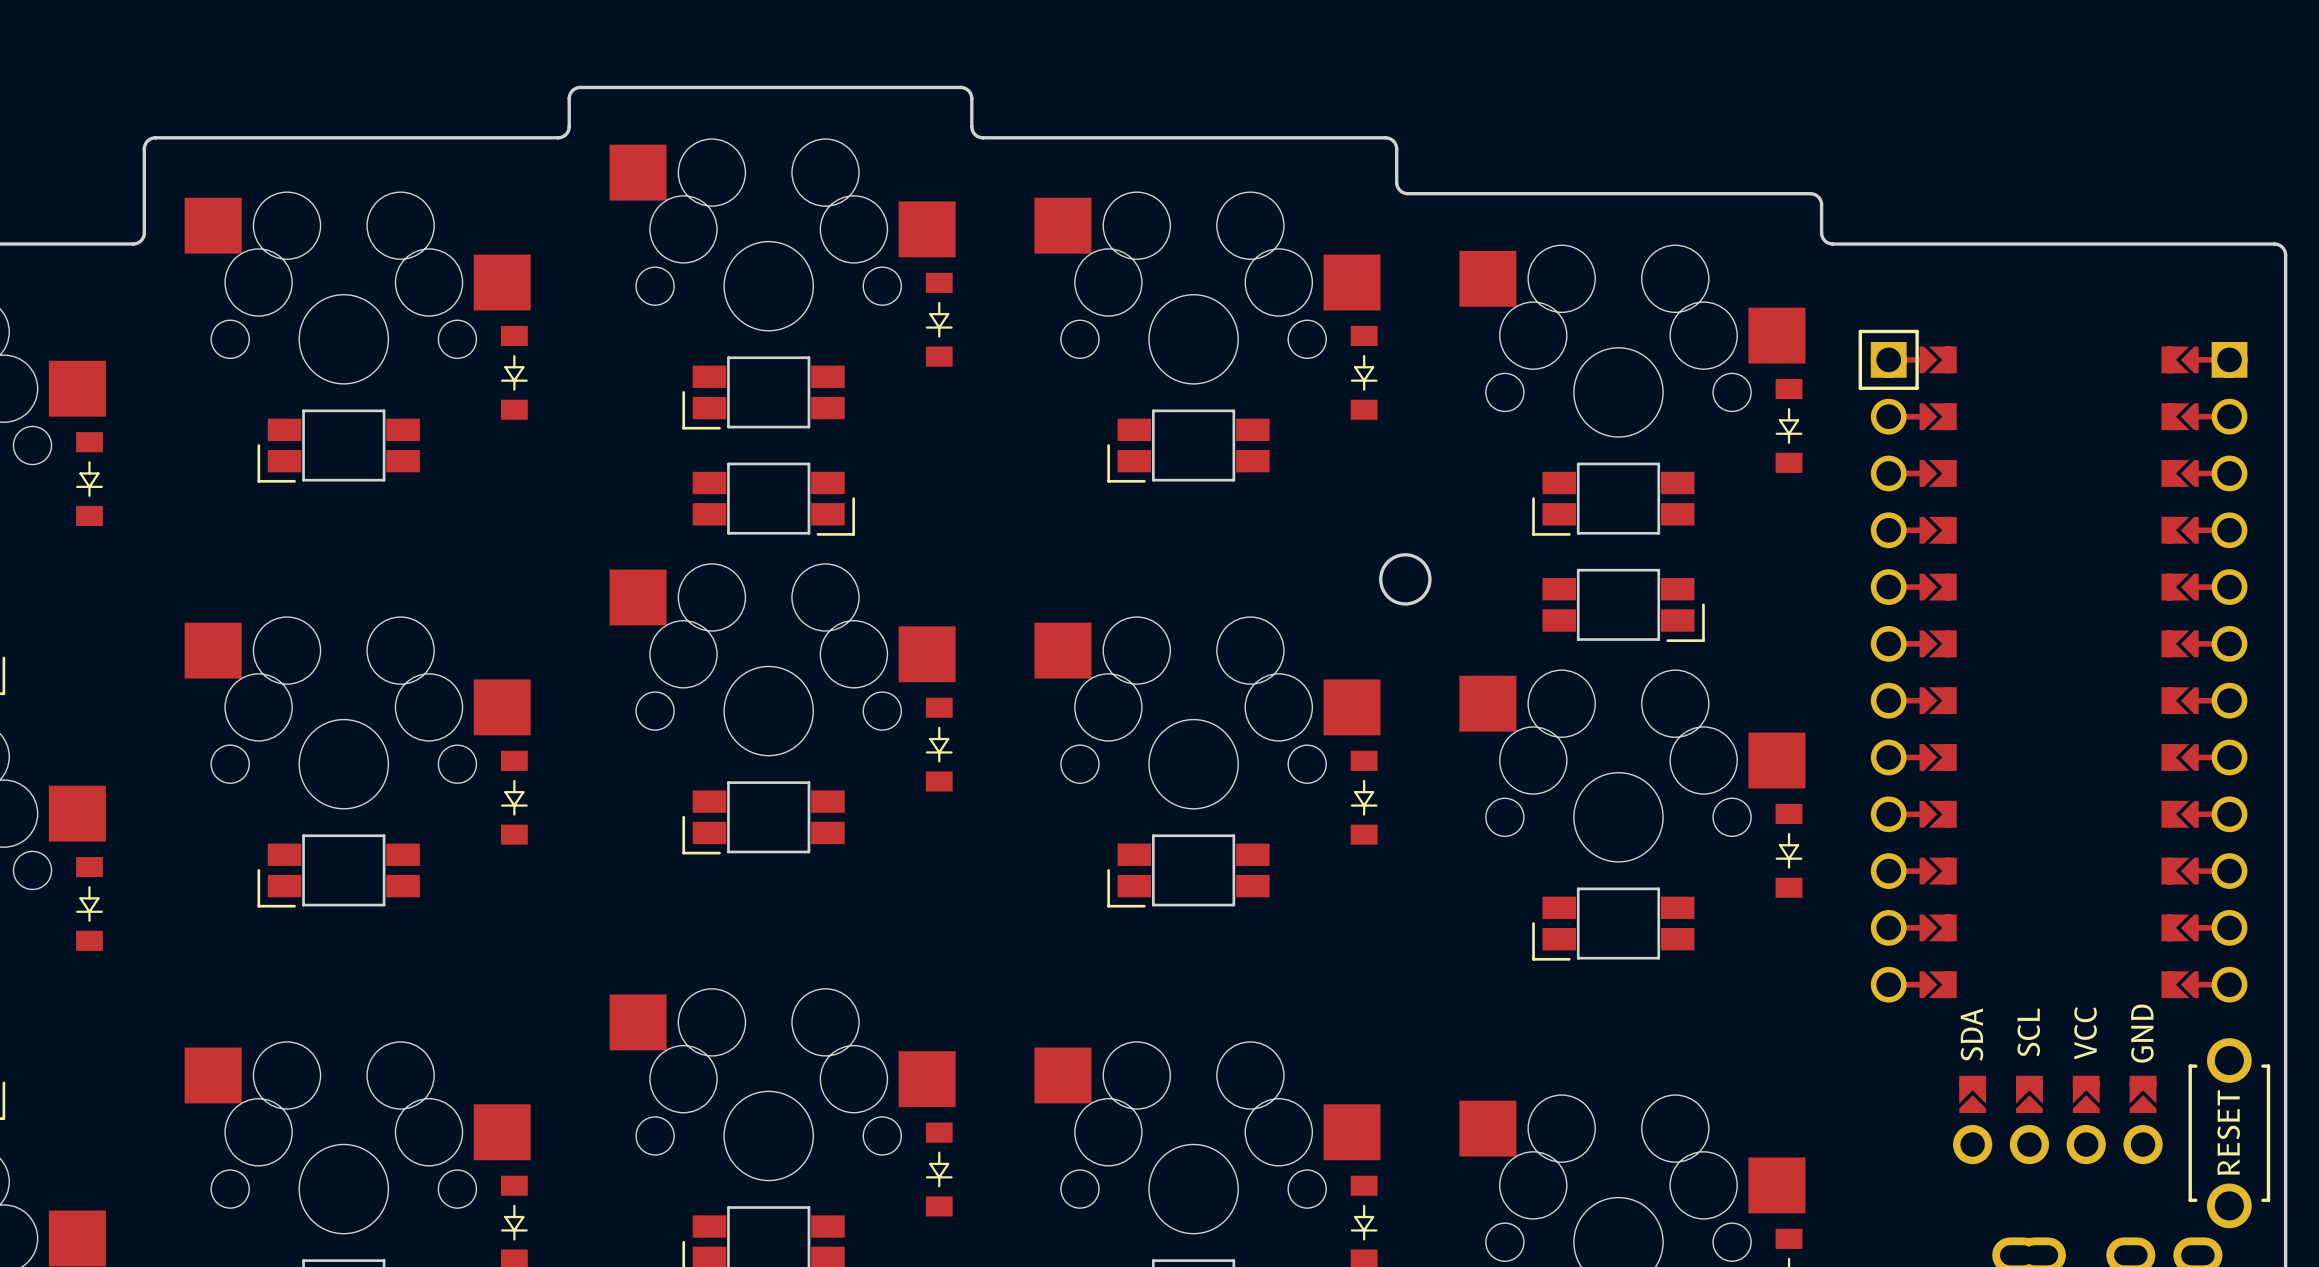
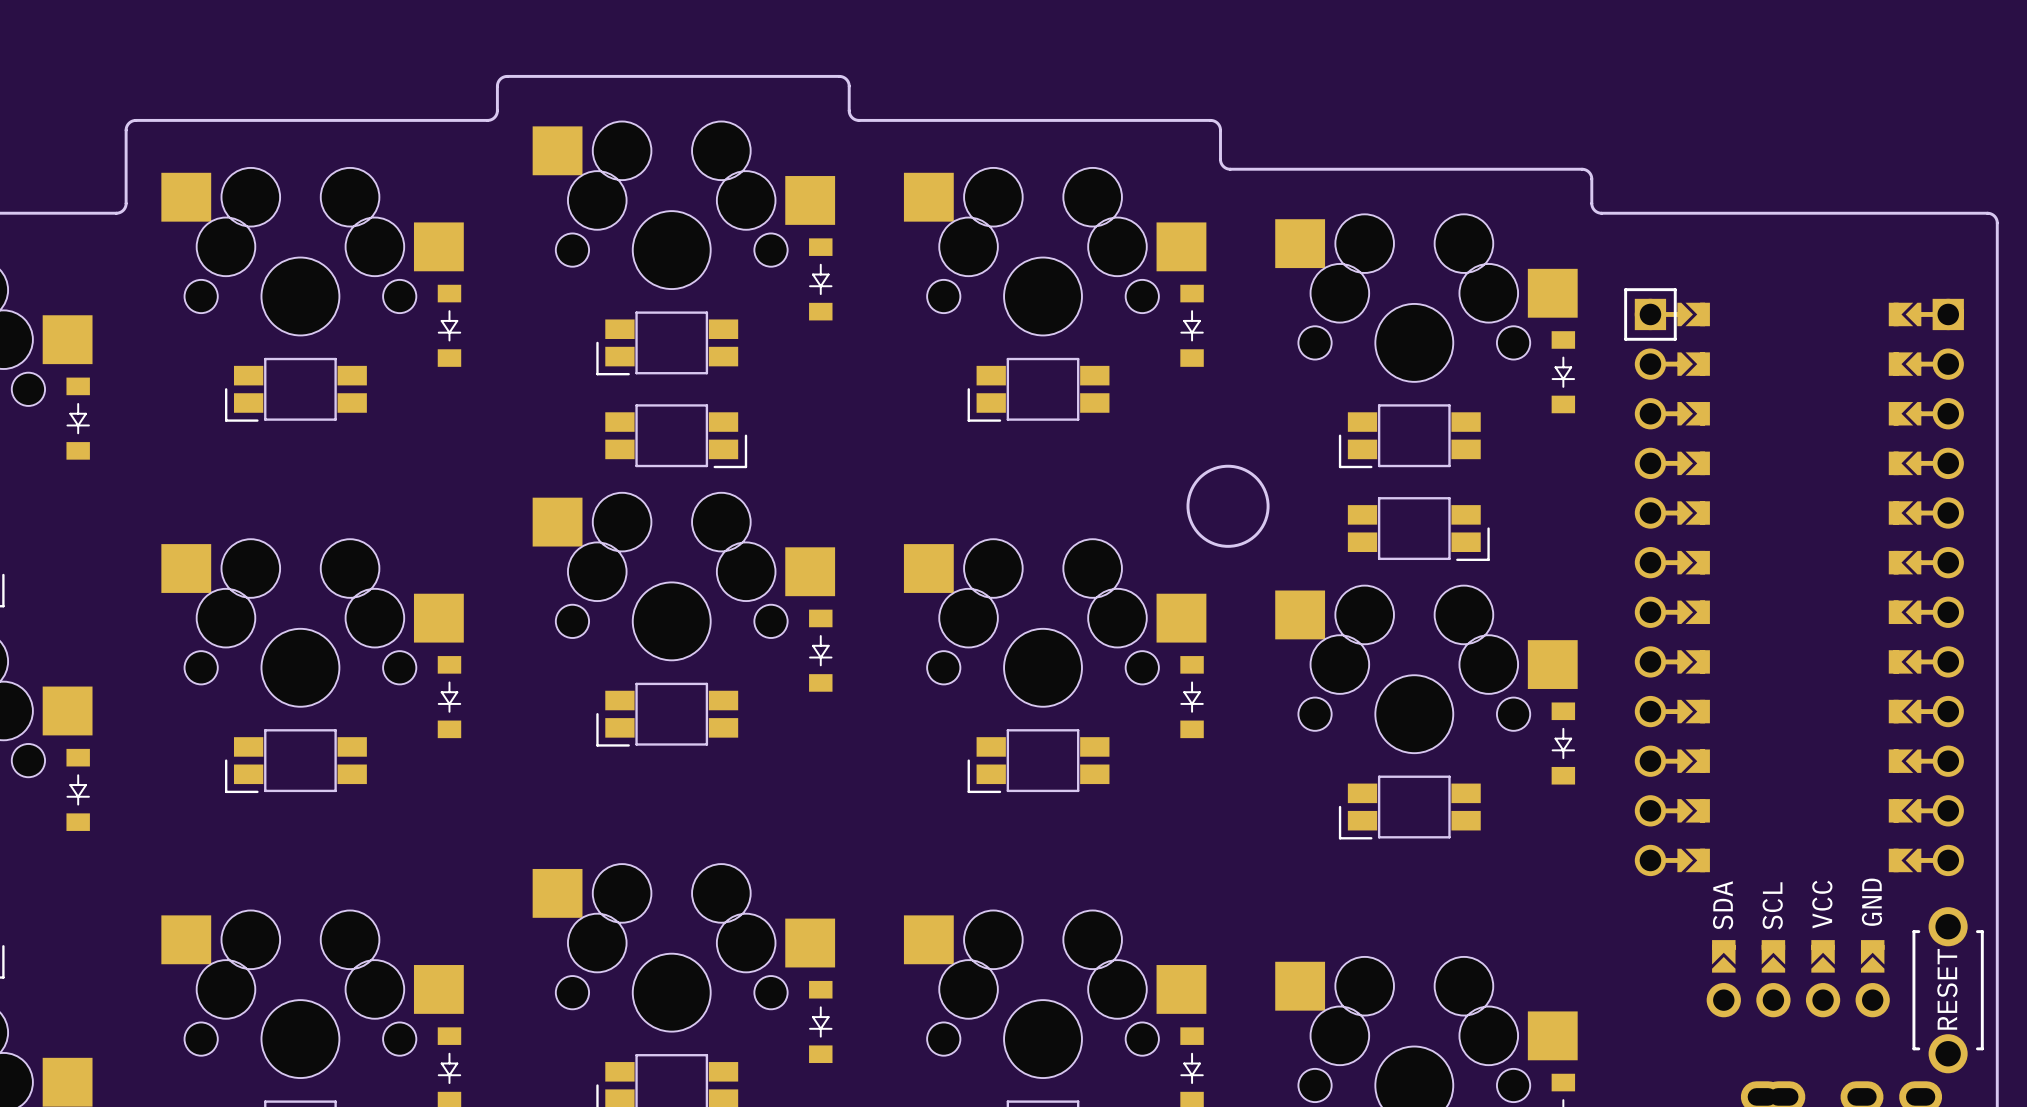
round board edge size: [1379, 553, 1432, 606] -> [1186, 464, 1270, 548]

